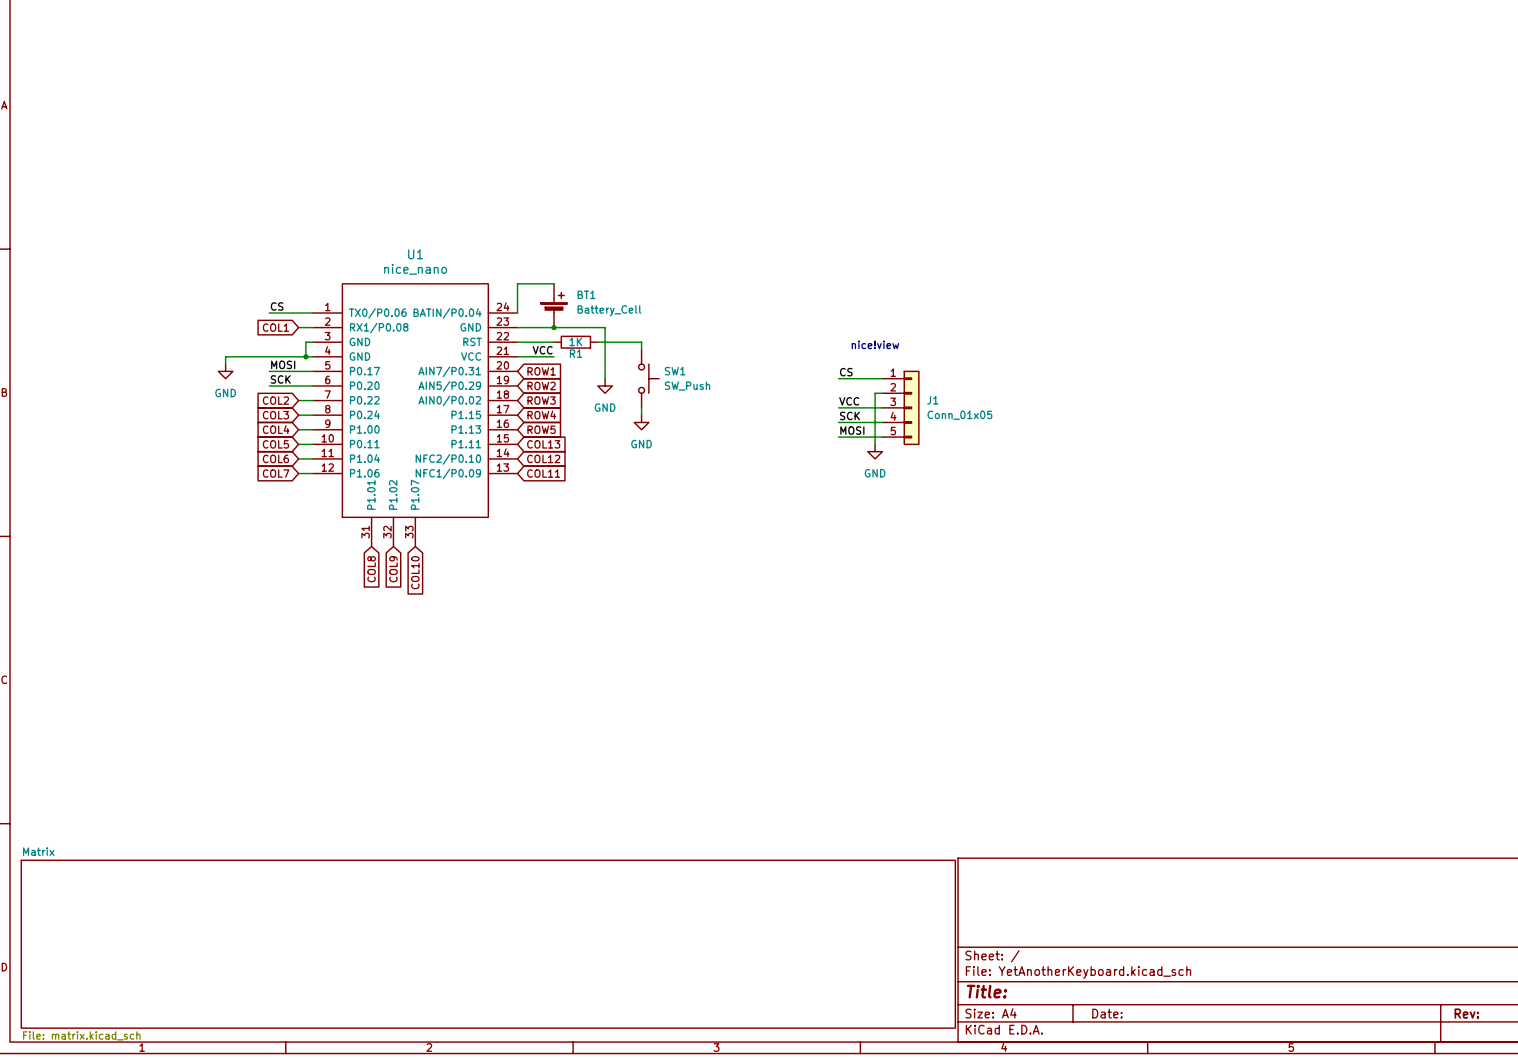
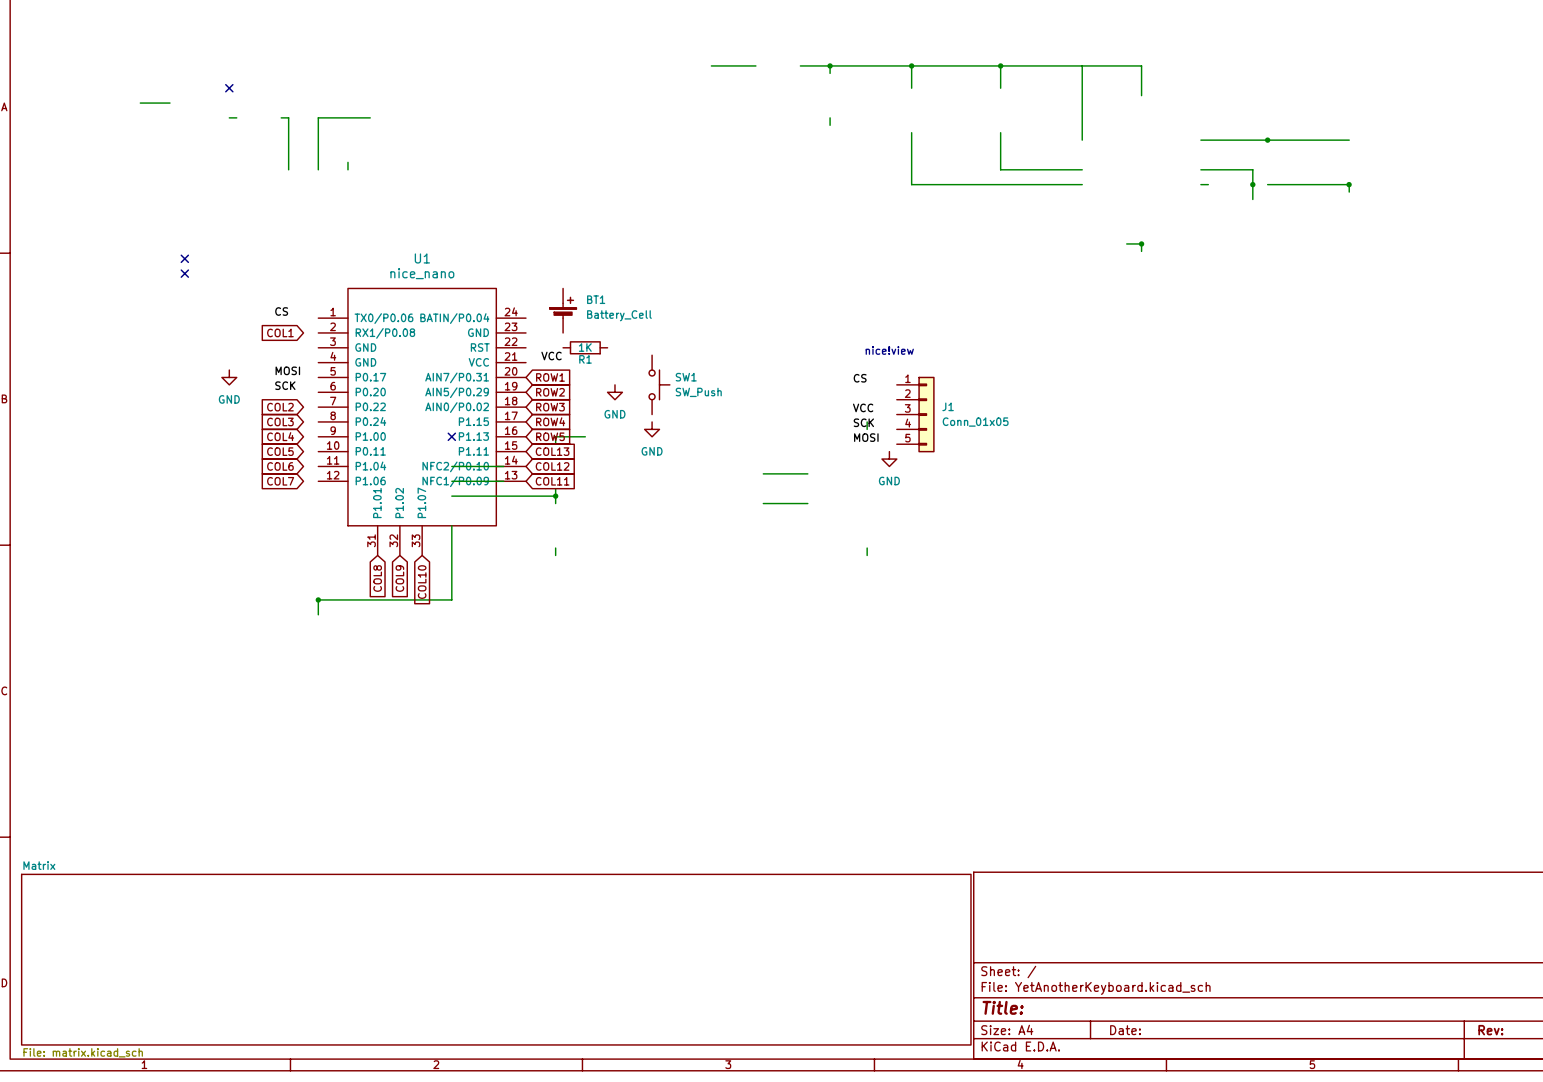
wire: none -> (711, 65) (755, 65)
wire: none -> (800, 65) (1141, 65) (1141, 95)
wire: none -> (830, 65) (830, 73)
junction: none -> (830, 65)
wire: none -> (911, 65) (911, 88)
junction: none -> (911, 65)
wire: none -> (1000, 65) (1000, 88)
junction: none -> (1000, 65)
wire: none -> (1082, 65) (1082, 140)
no-connect mark: none -> (229, 88)
wire: none -> (140, 103) (169, 103)
wire: none -> (229, 117) (236, 117)
wire: none -> (281, 117) (288, 117) (288, 169)
wire: none -> (370, 117) (318, 117) (318, 169)
wire: none -> (830, 117) (830, 125)
wire: none -> (911, 132) (911, 184) (1082, 184)
wire: none -> (1000, 132) (1000, 169) (1082, 169)
wire: none -> (1200, 140) (1349, 140)
junction: none -> (1267, 140)
wire: none -> (347, 162) (347, 169)
wire: none -> (1200, 169) (1252, 169) (1252, 199)
wire: none -> (1200, 184) (1208, 184)
junction: none -> (1252, 184)
wire: none -> (1267, 184) (1349, 184) (1349, 192)
junction: none -> (1349, 184)
wire: none -> (1126, 243) (1141, 243) (1141, 251)
junction: none -> (1141, 243)
no-connect mark: none -> (184, 258)
no-connect mark: none -> (184, 273)
wire: (554, 283) (517, 283) (517, 313) -> none
wire: (269, 313) (313, 313) -> none
wire: (298, 327) (313, 327) -> none
wire: (517, 327) (605, 327) (605, 378) -> none
junction: (554, 327) -> none
wire: (313, 342) (305, 342) (305, 356) -> none
wire: (517, 342) (554, 342) -> none
wire: (597, 342) (641, 342) (641, 349) -> none
junction: (305, 356) -> none
wire: (313, 356) (225, 356) (225, 364) -> none
wire: (517, 356) (554, 356) -> none
wire: (269, 371) (313, 371) -> none
wire: (838, 378) (882, 378) -> none
wire: (269, 385) (313, 385) -> none
wire: (882, 393) (875, 393) (875, 444) -> none
wire: (298, 400) (313, 400) -> none
wire: (641, 407) (641, 415) -> none
wire: (838, 407) (882, 407) -> (763, 473) (807, 473)
wire: (298, 415) (313, 415) -> none
wire: none -> (867, 421) (867, 429)
wire: (838, 422) (882, 422) -> none
wire: (298, 429) (313, 429) -> none
no-connect mark: none -> (451, 436)
wire: none -> (585, 436) (555, 436) (555, 444)
wire: (838, 437) (882, 437) -> (763, 503) (807, 503)
wire: (298, 444) (313, 444) -> none
wire: (298, 458) (313, 458) -> none
wire: none -> (451, 466) (503, 466)
wire: (298, 473) (313, 473) -> none
wire: none -> (451, 481) (503, 481)
wire: none -> (555, 488) (555, 503)
wire: none -> (451, 496) (555, 496)
junction: none -> (555, 496)
wire: none -> (451, 525) (451, 599) (318, 599) (318, 614)
wire: none -> (555, 548) (555, 555)
wire: none -> (867, 548) (867, 555)
junction: none -> (318, 599)

